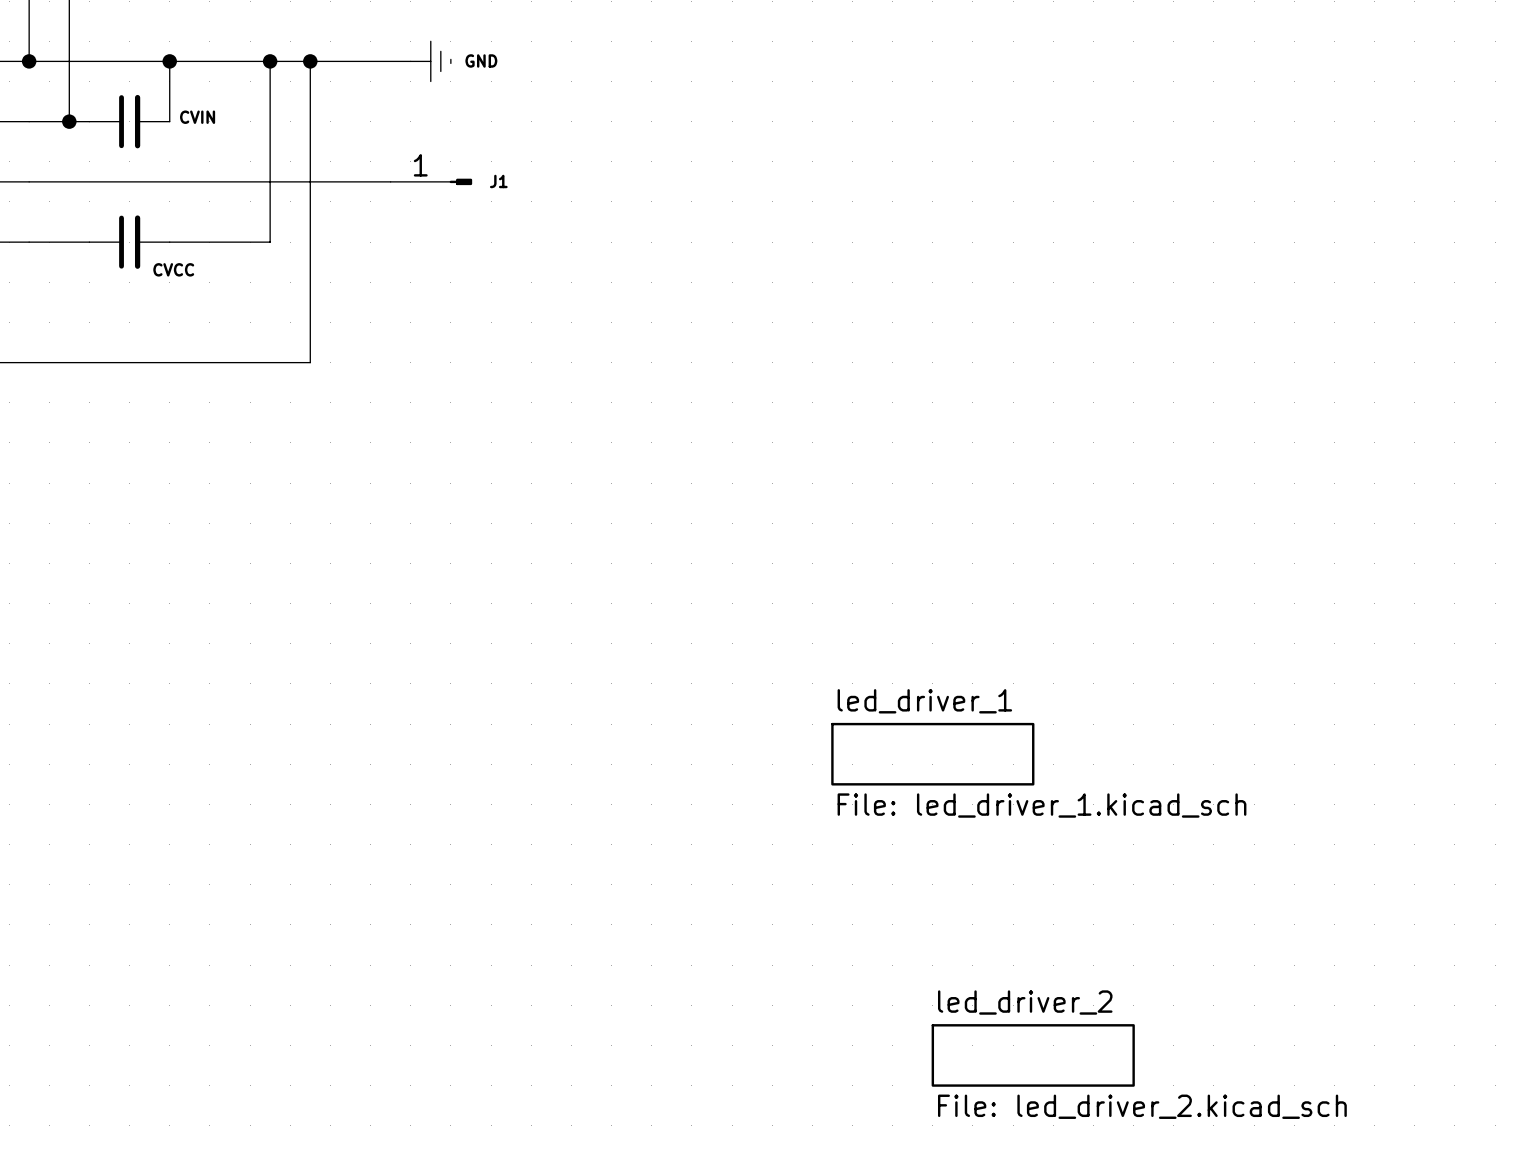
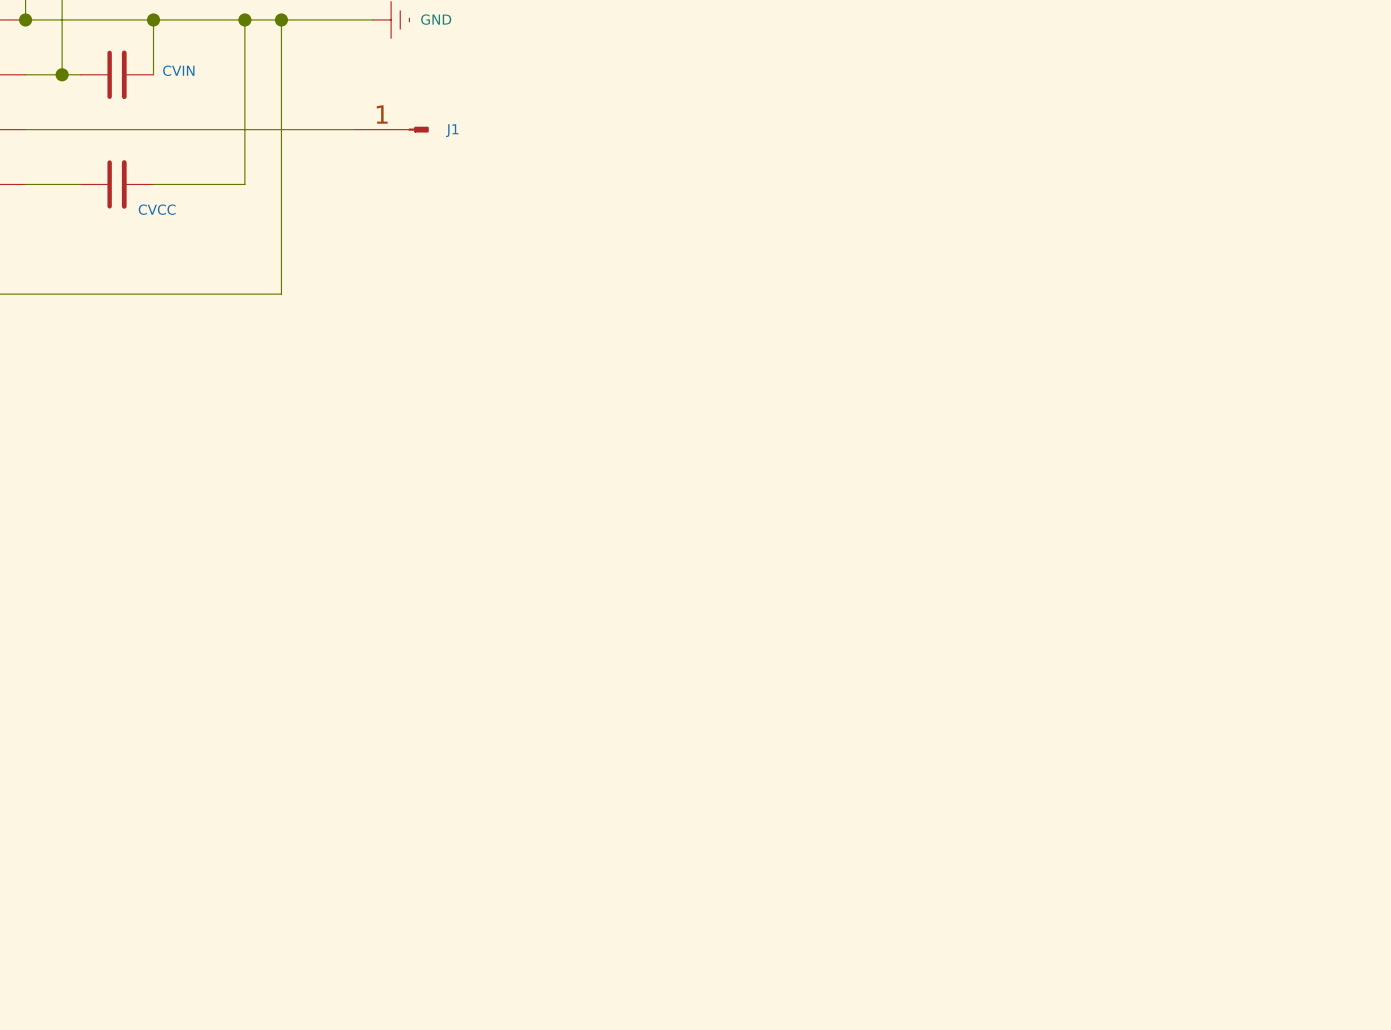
sheet led_driver_1: File: led_driver_1.kicad_sch (932, 754) -> none
sheet led_driver_2: File: led_driver_2.kicad_sch (1033, 1055) -> none

